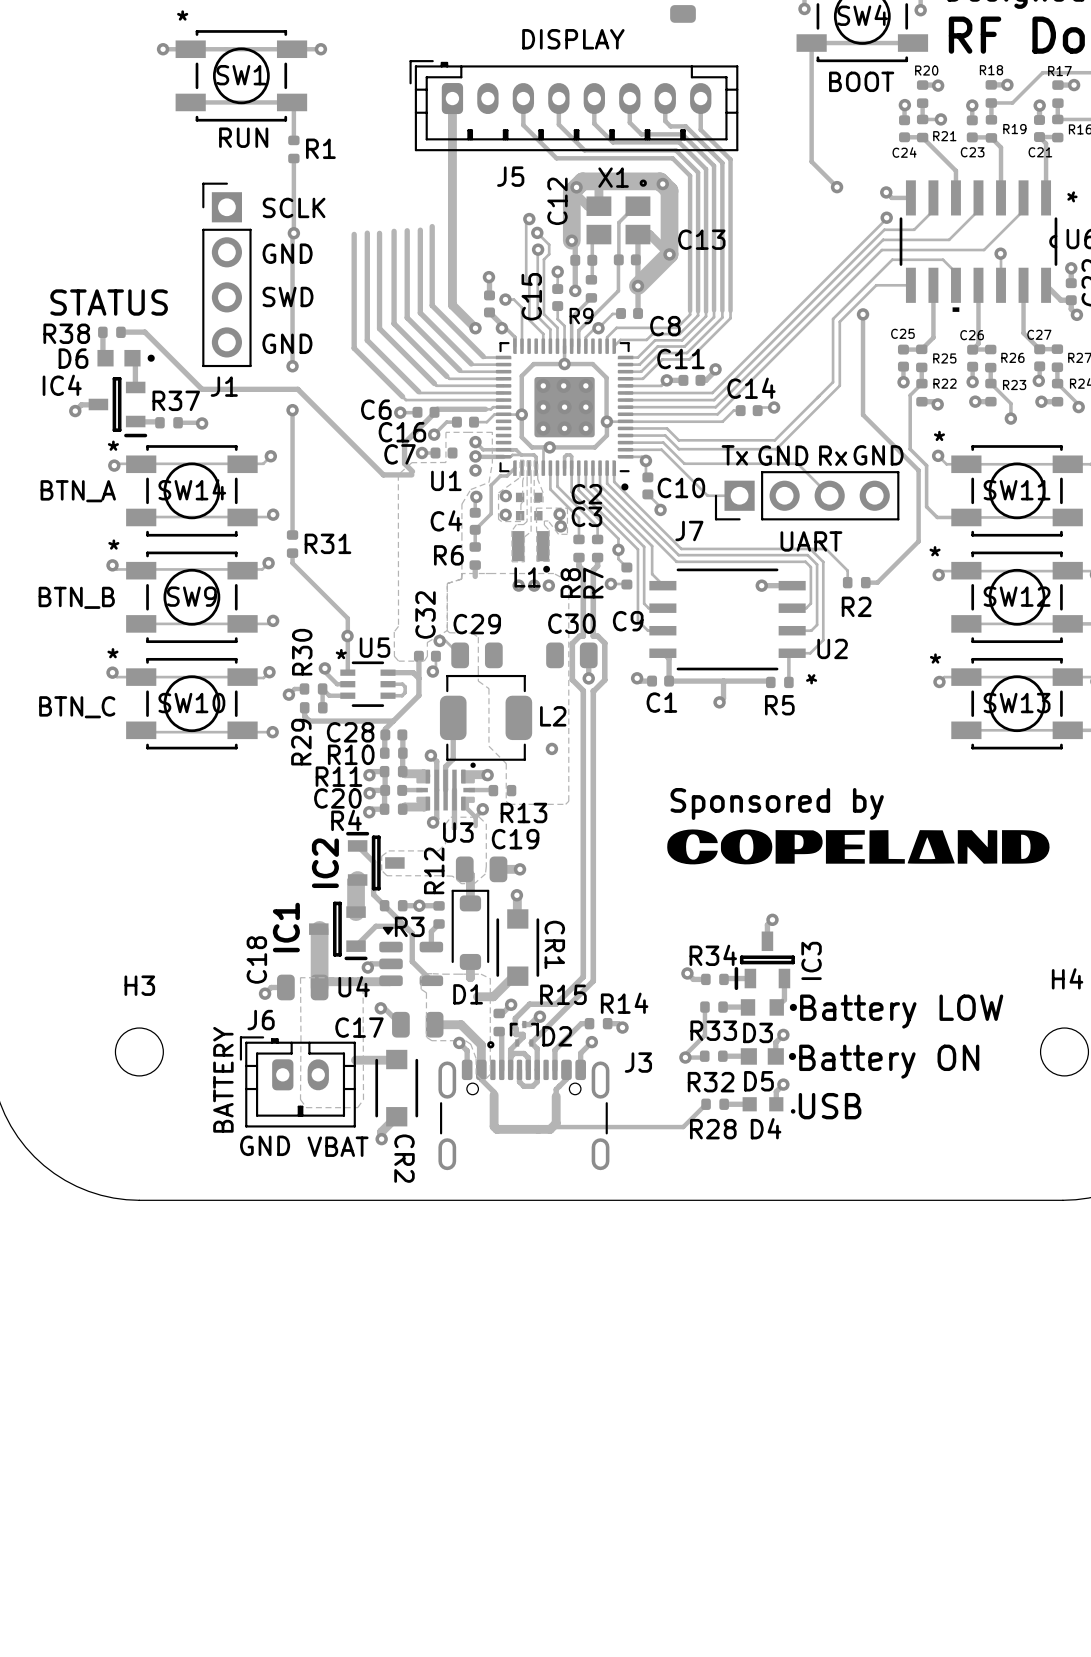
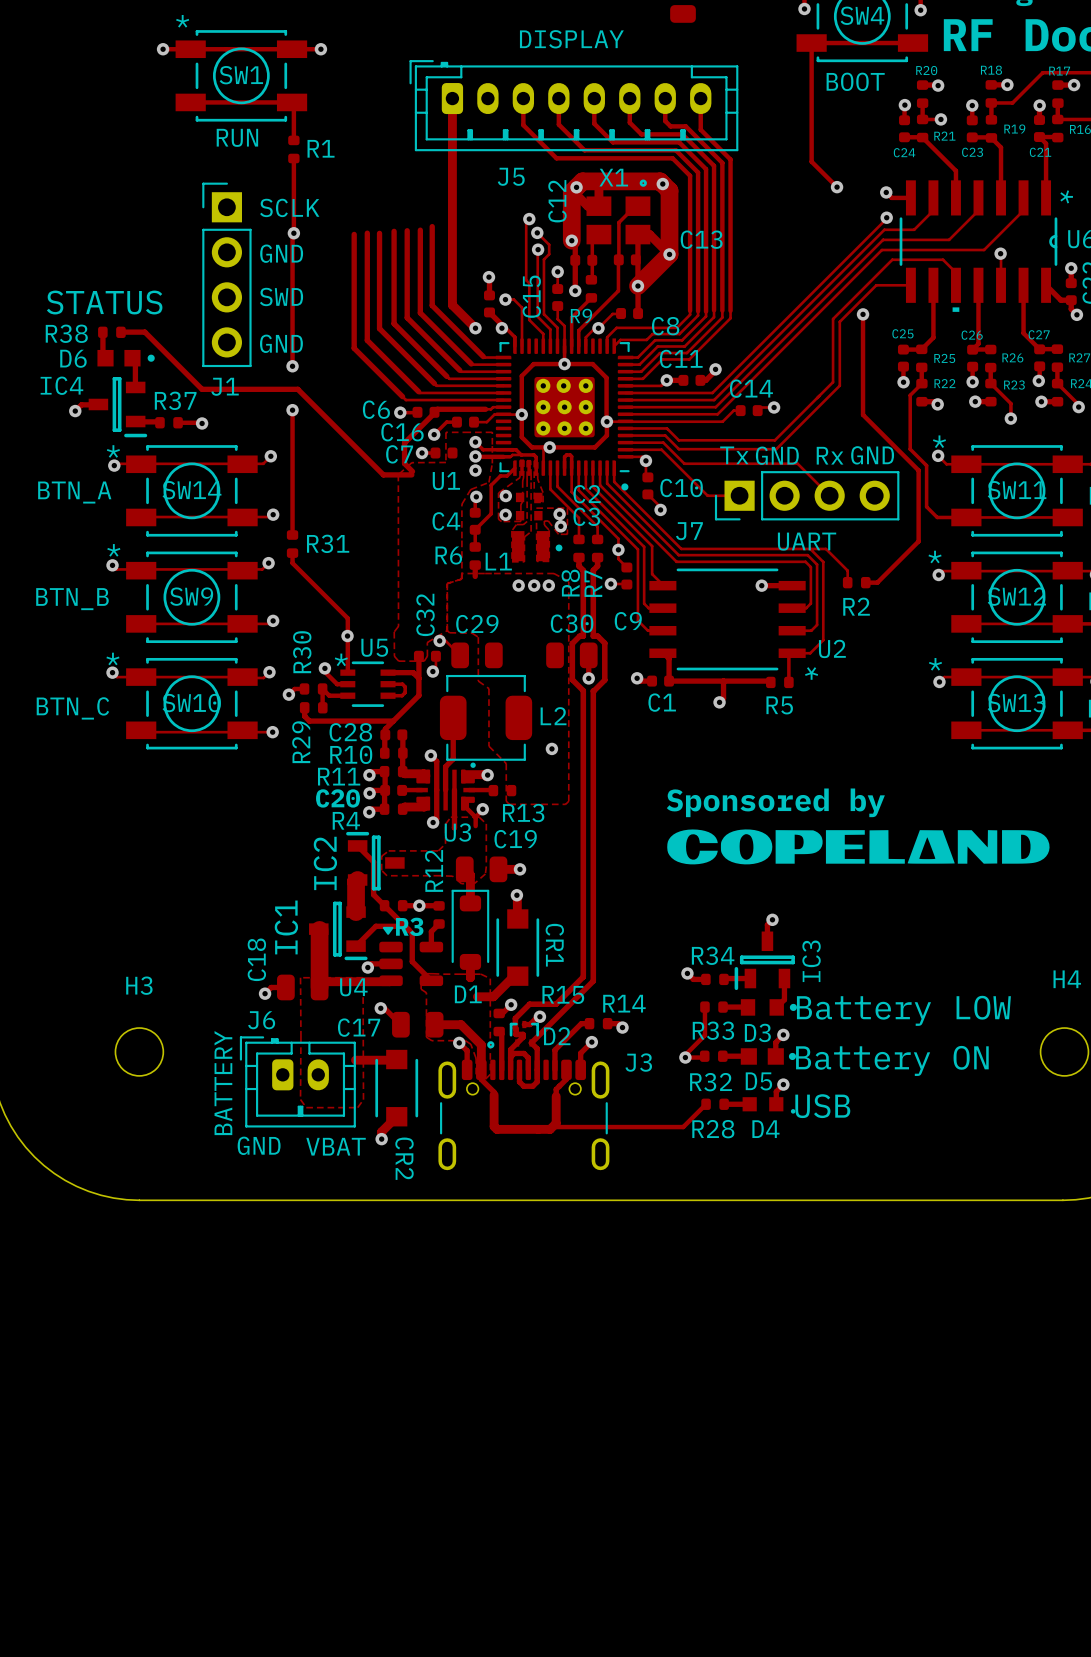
L1 footprint: [512, 531, 551, 573] -> [512, 531, 563, 562]
L1 name position: L1 (527, 577) -> L1 (498, 561)

